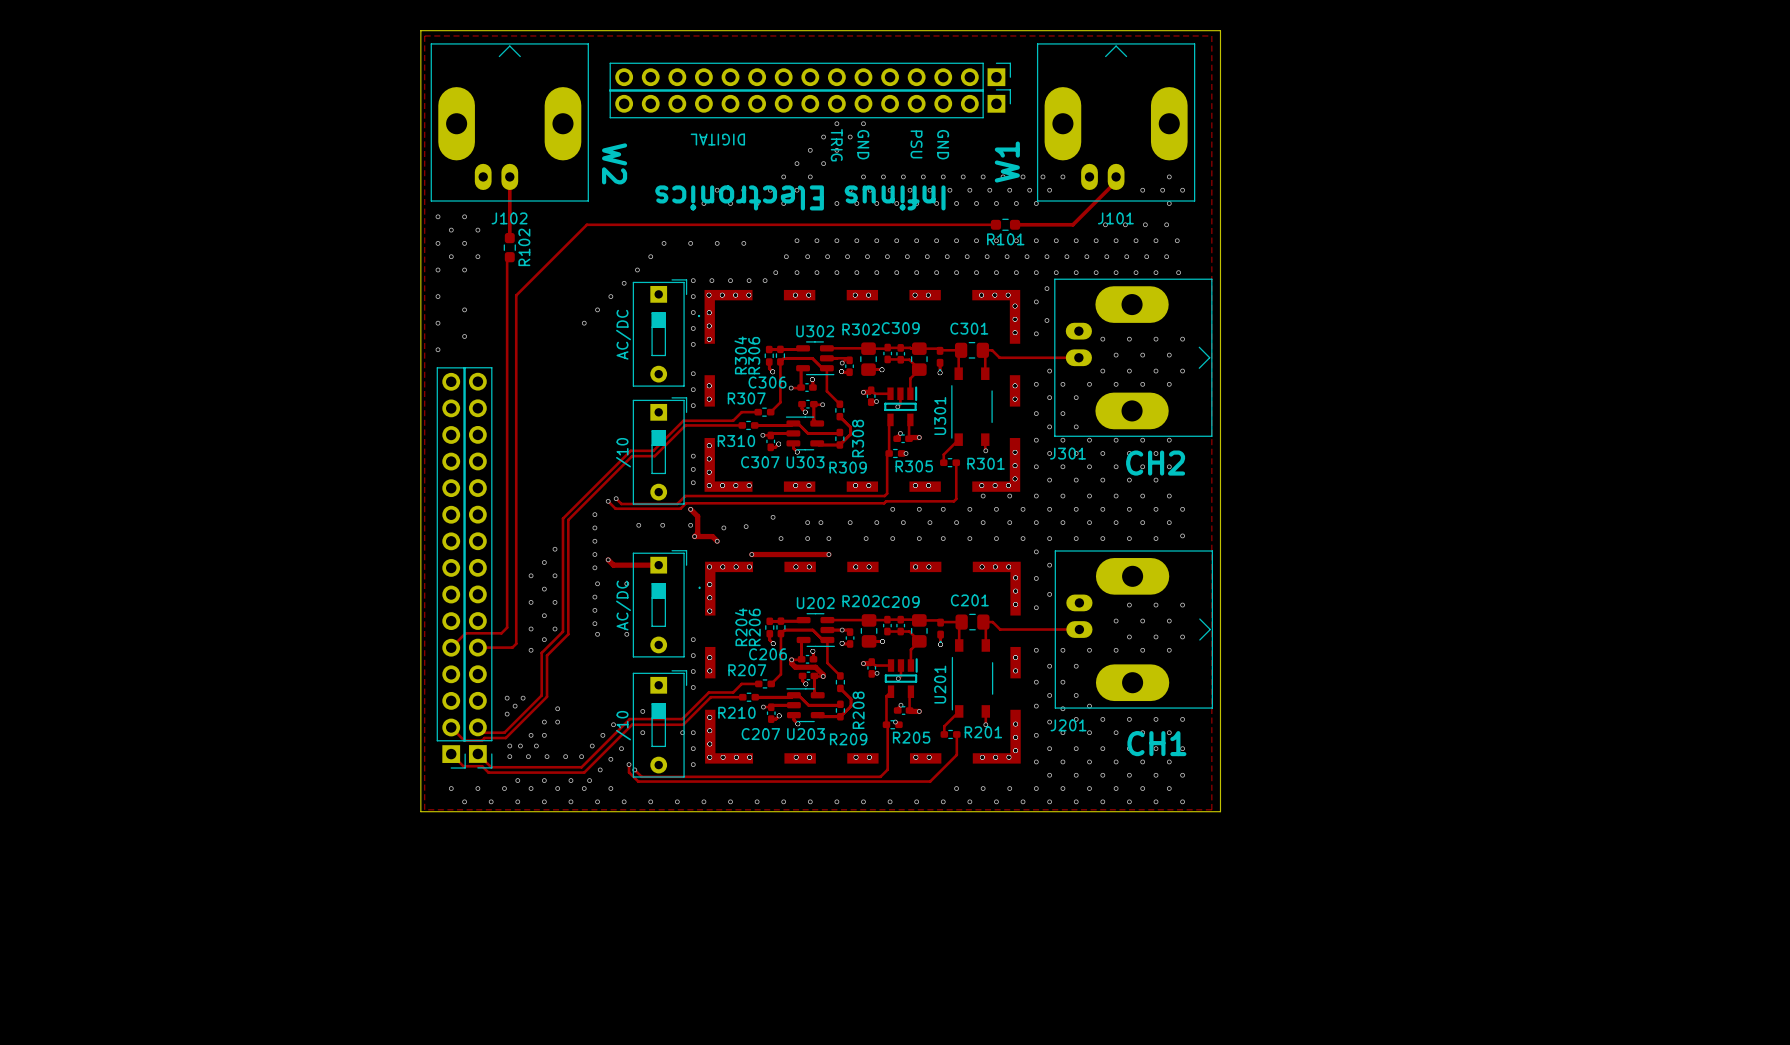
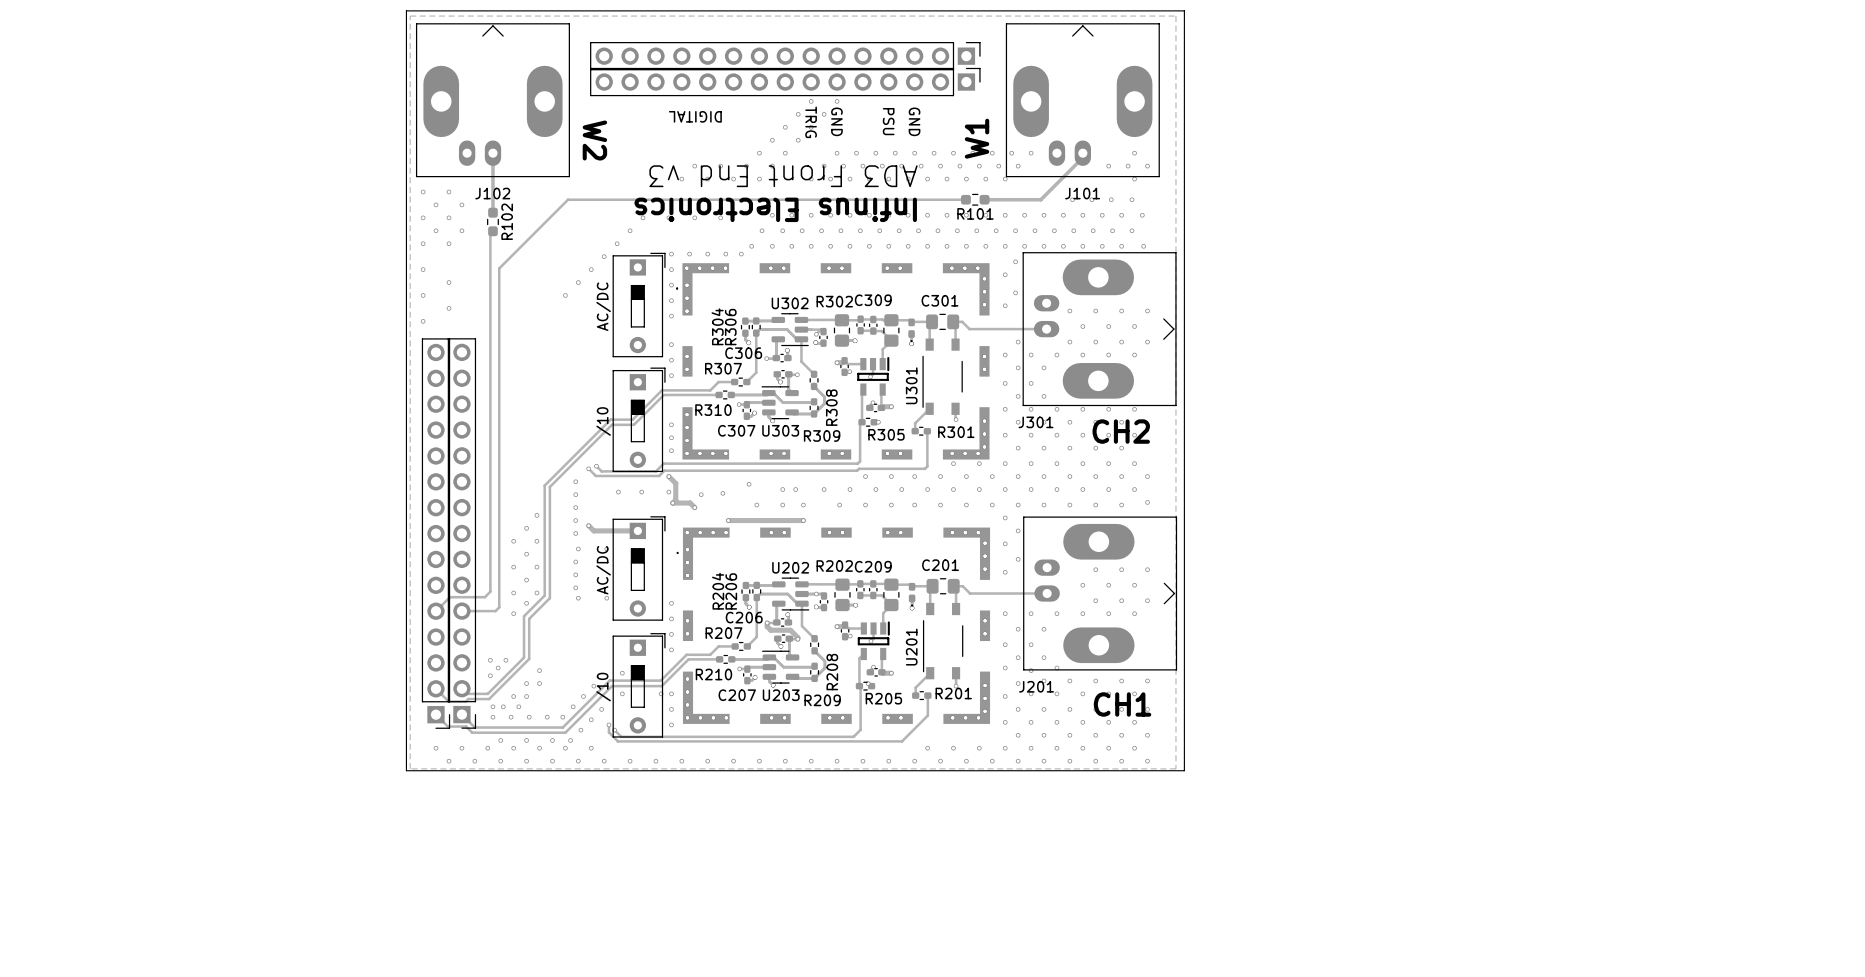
text: Infinus Electronics (800, 197) -> AD3 Front End v3 (783, 176)
text: none -> Infinus Electronics (775, 209)

